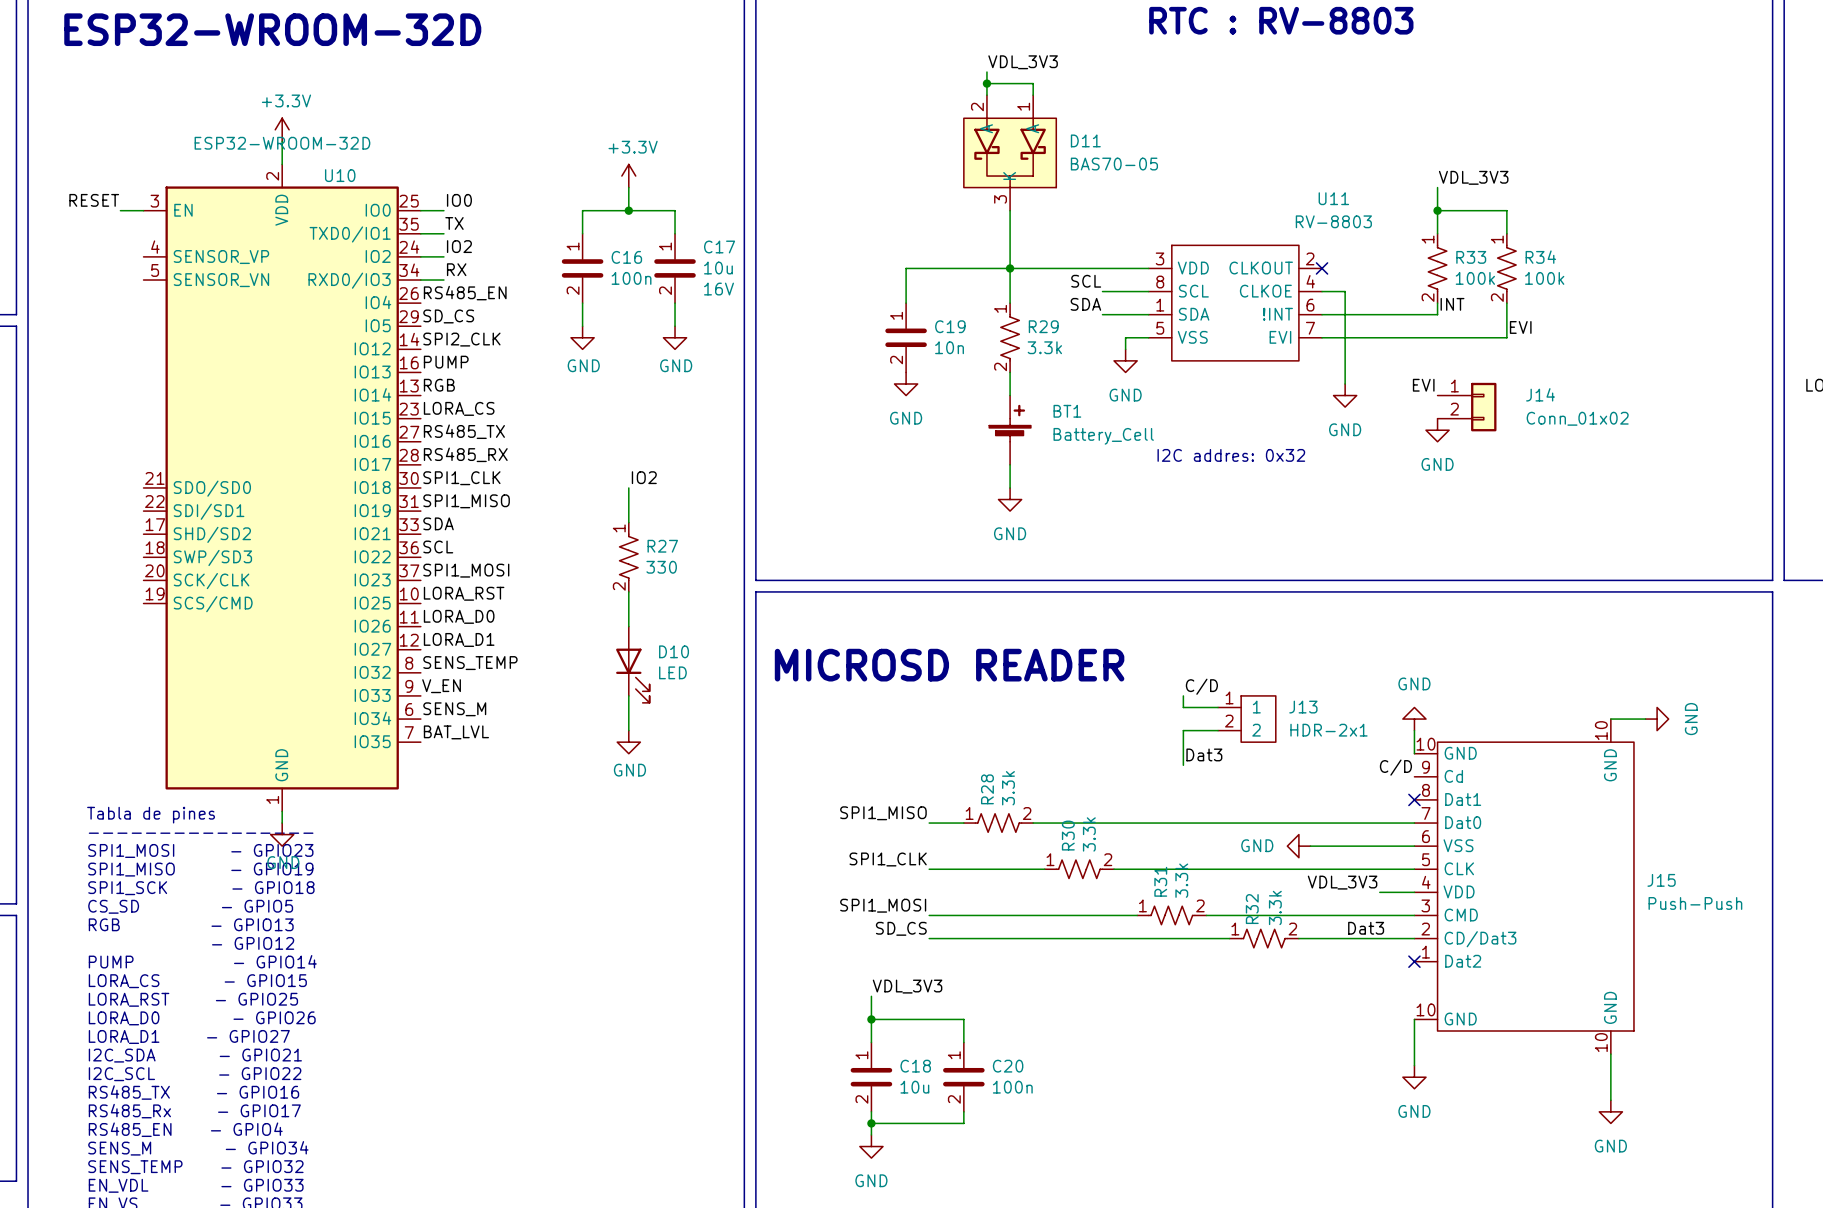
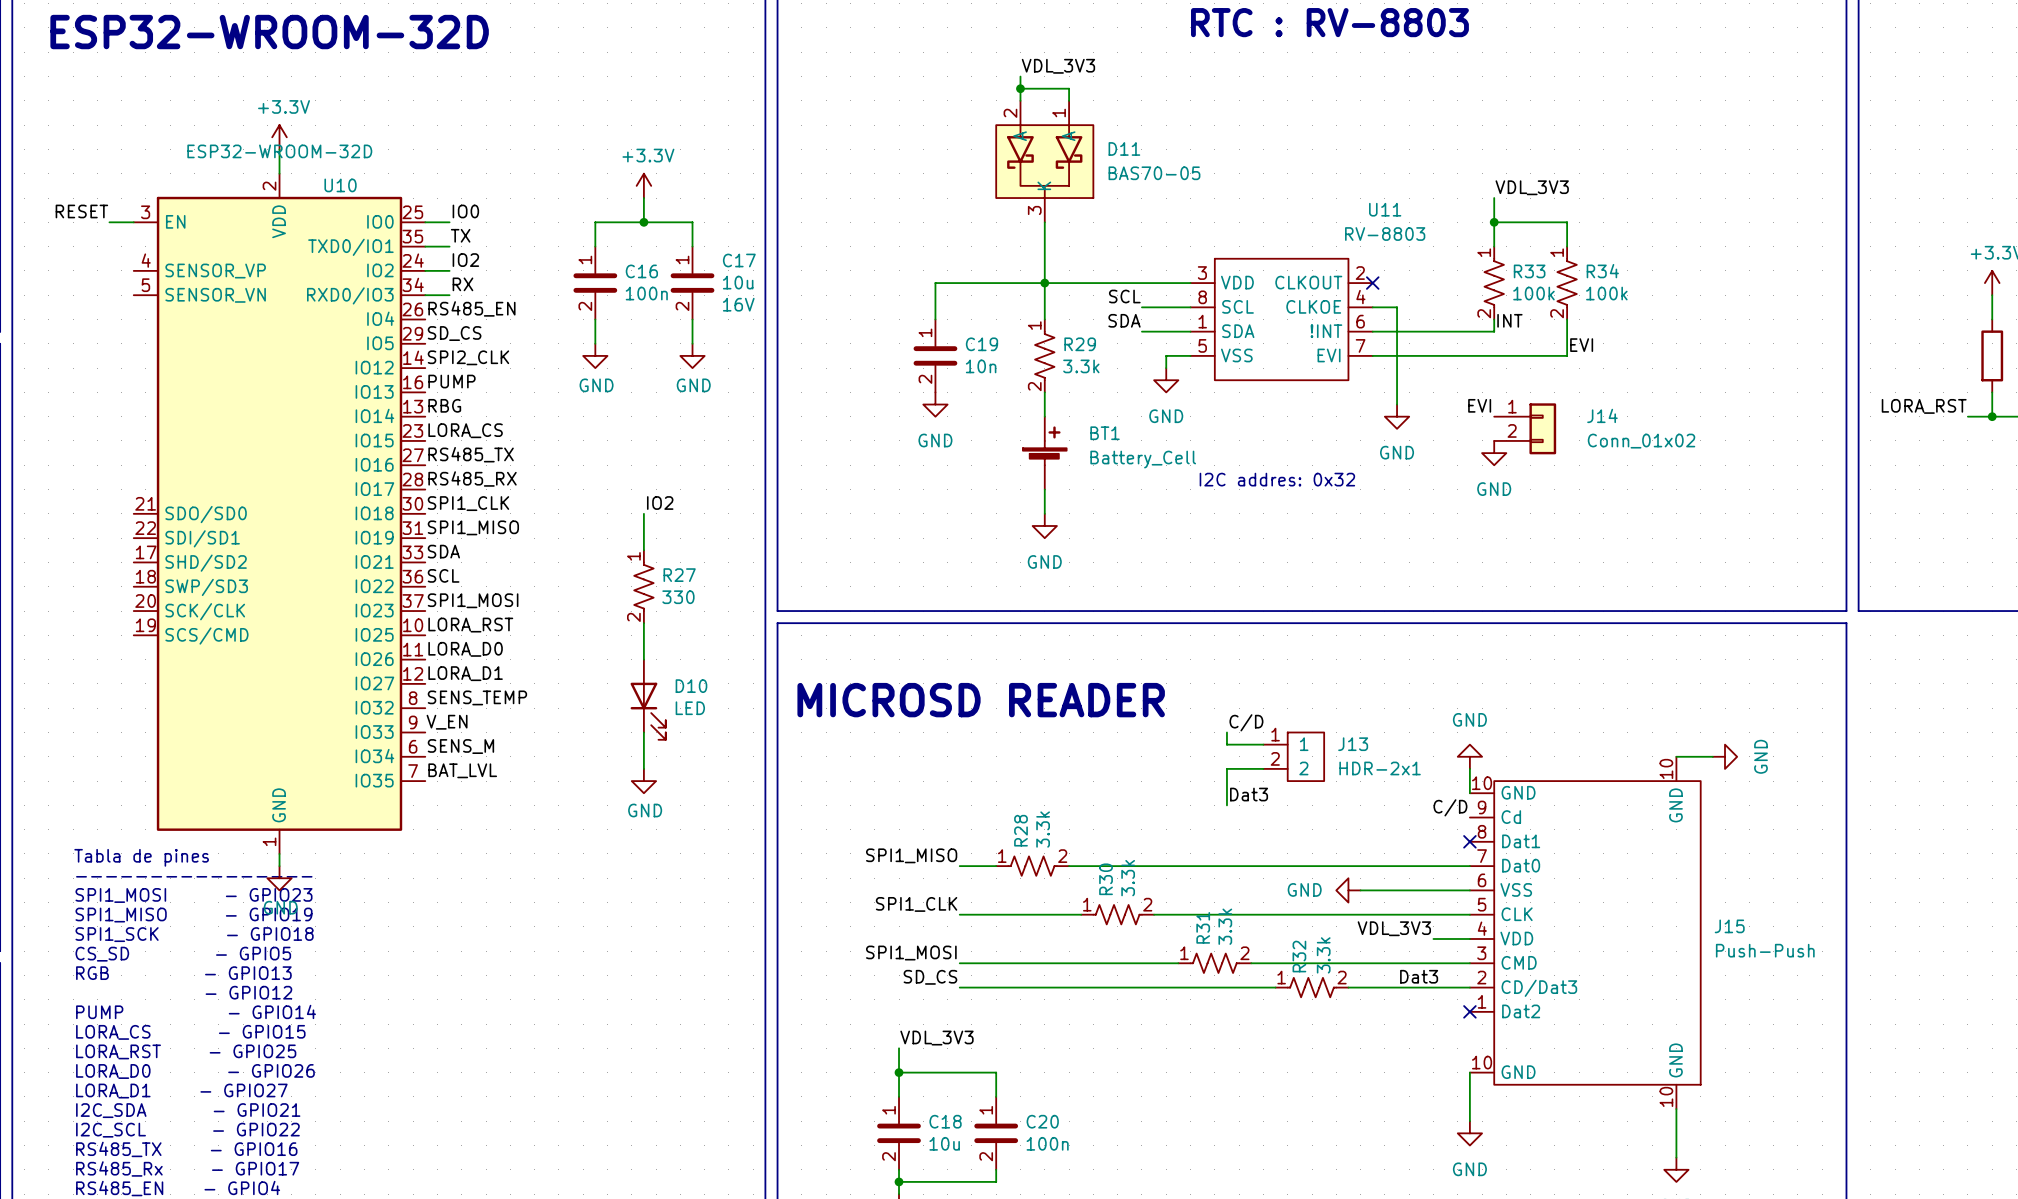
label: RGB (439, 385) -> RBG (444, 405)

